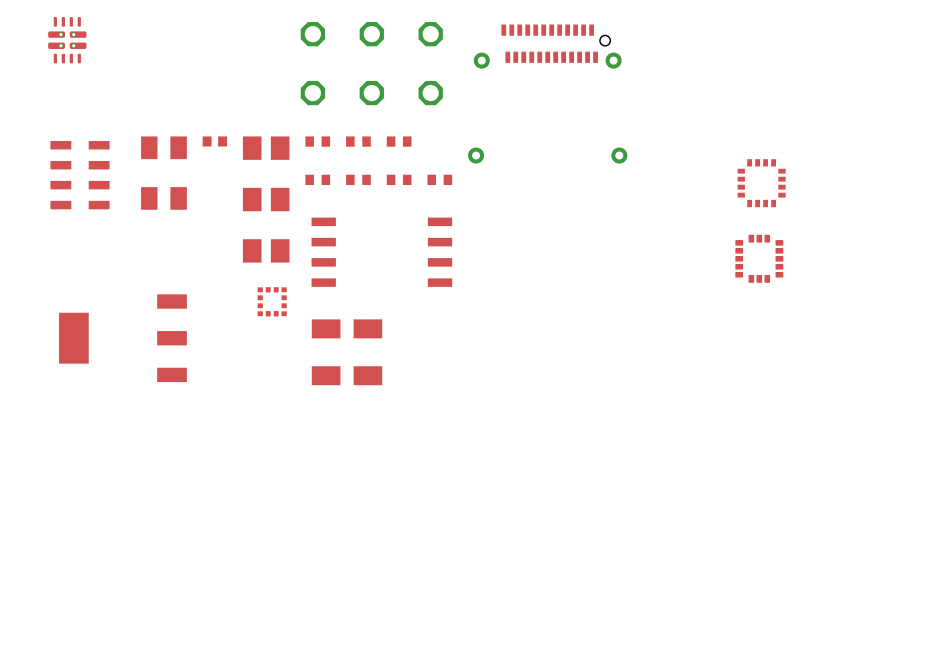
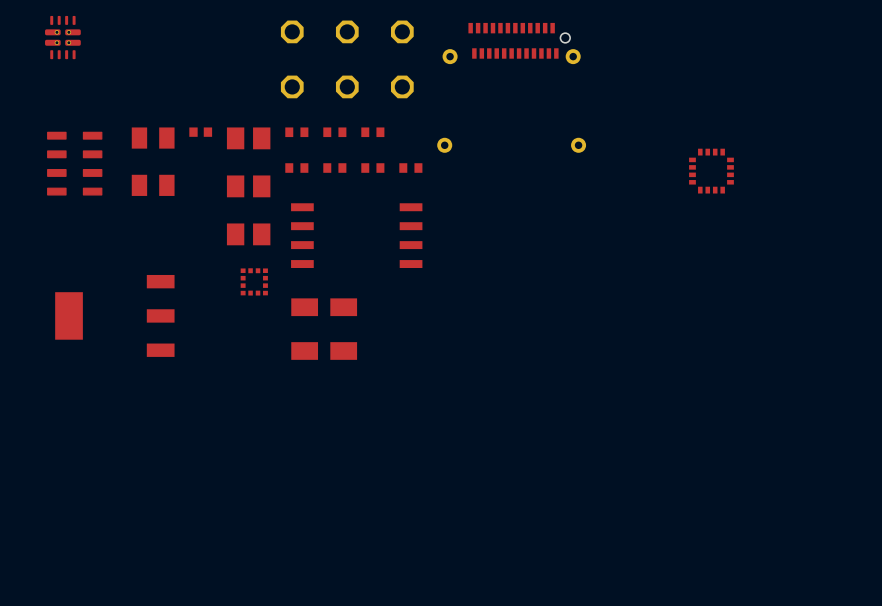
part: (759, 258) -> none

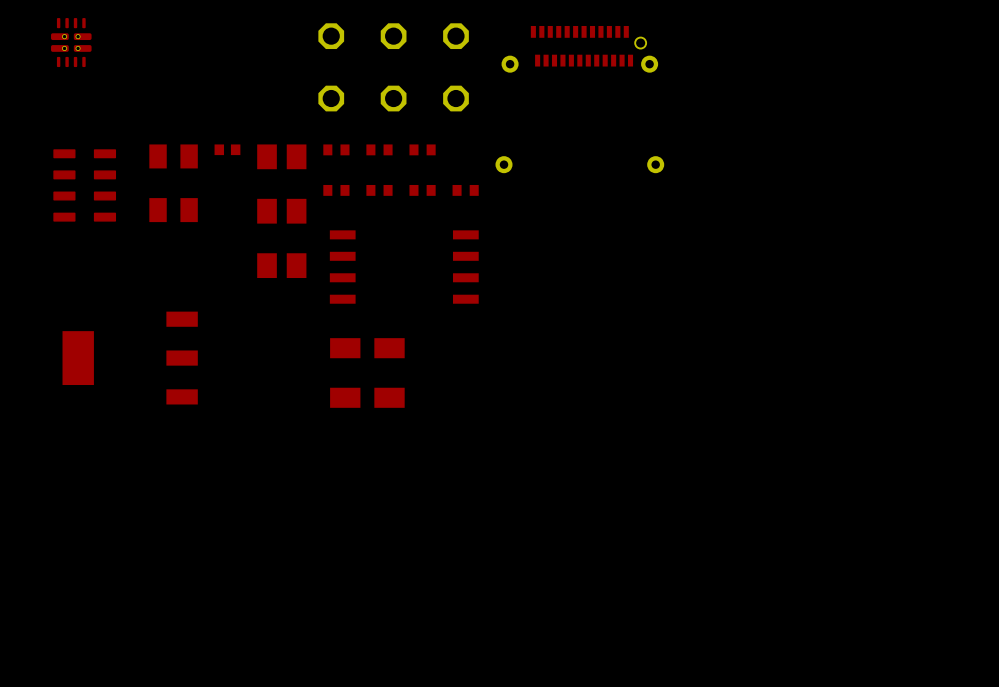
part: (711, 171) -> none
part: (254, 281) -> none

